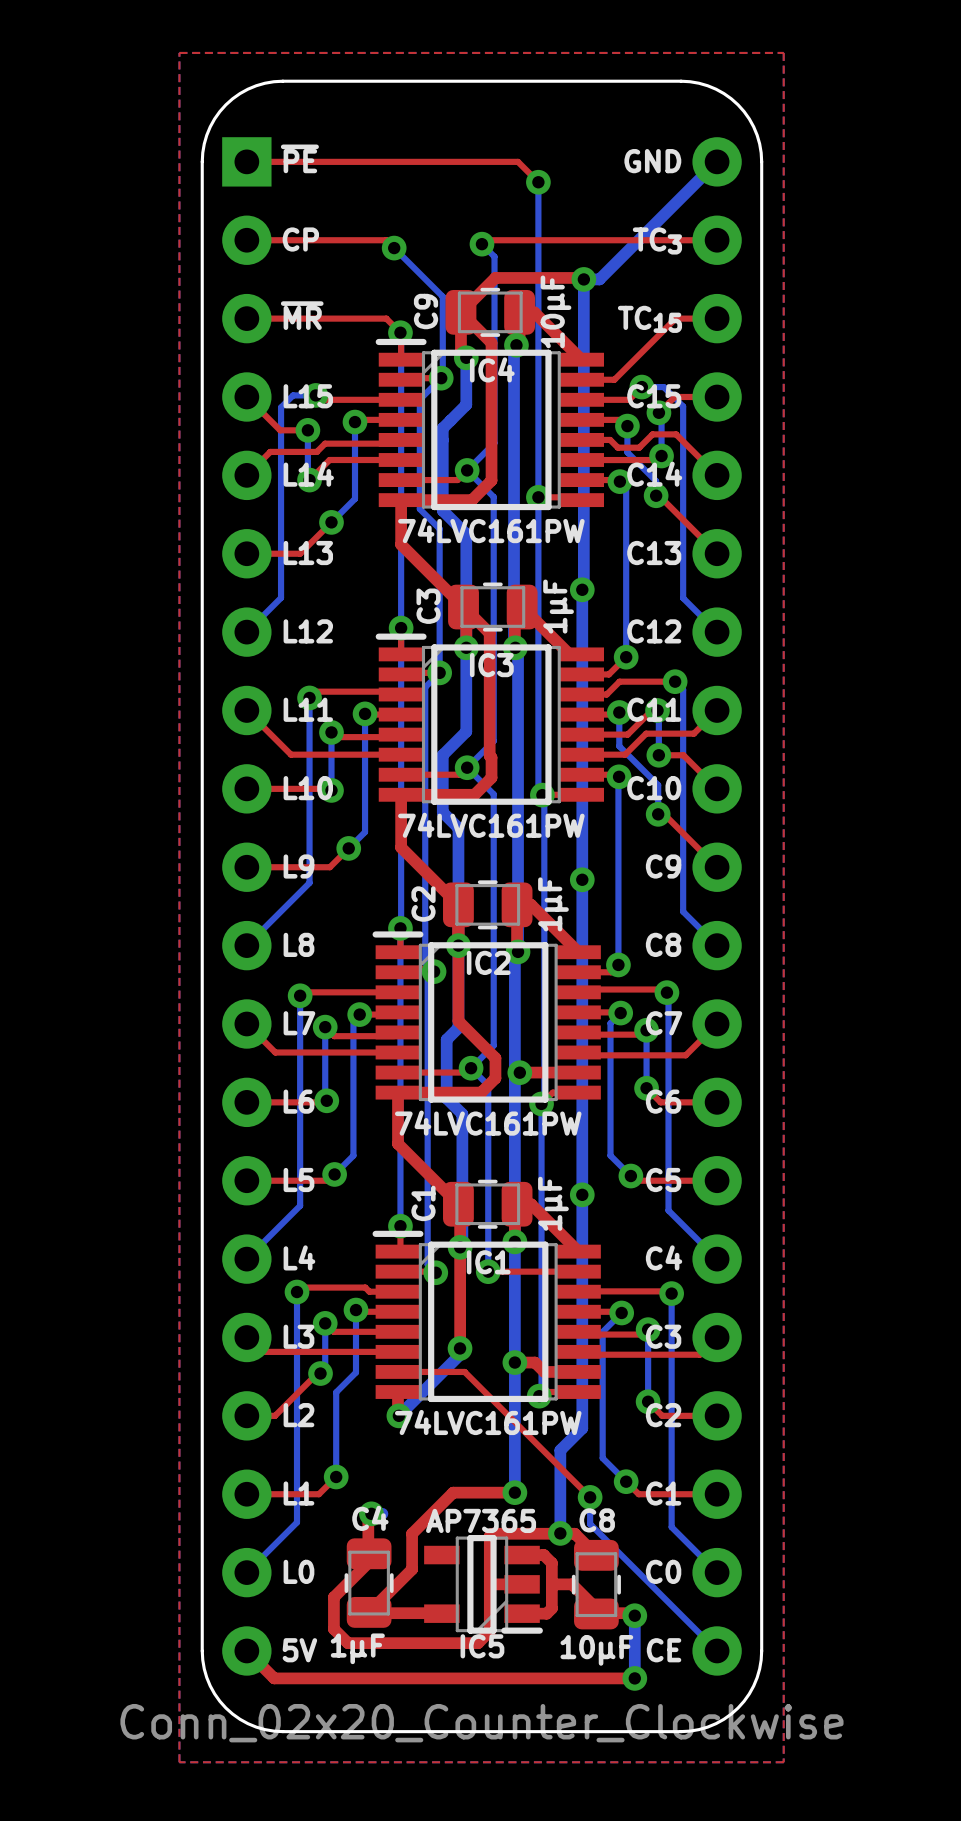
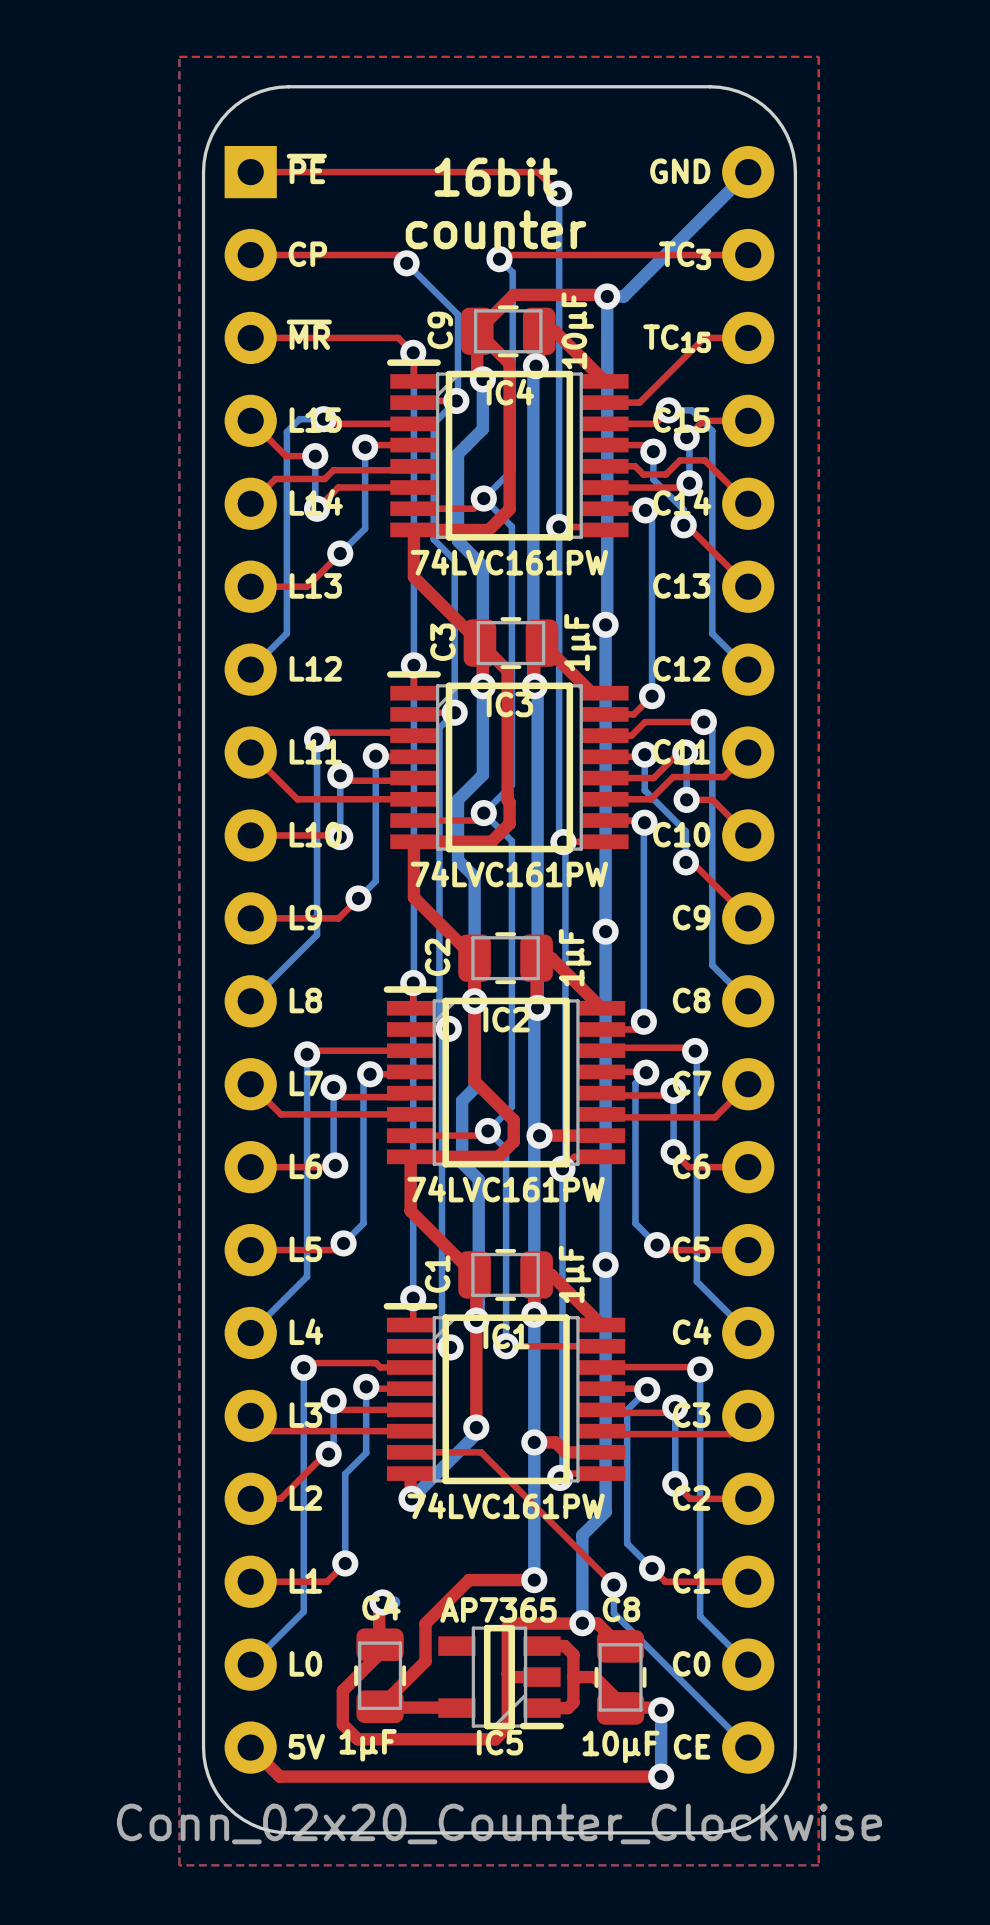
text: none -> 16bit (496, 177)
text: none -> counter (496, 229)

